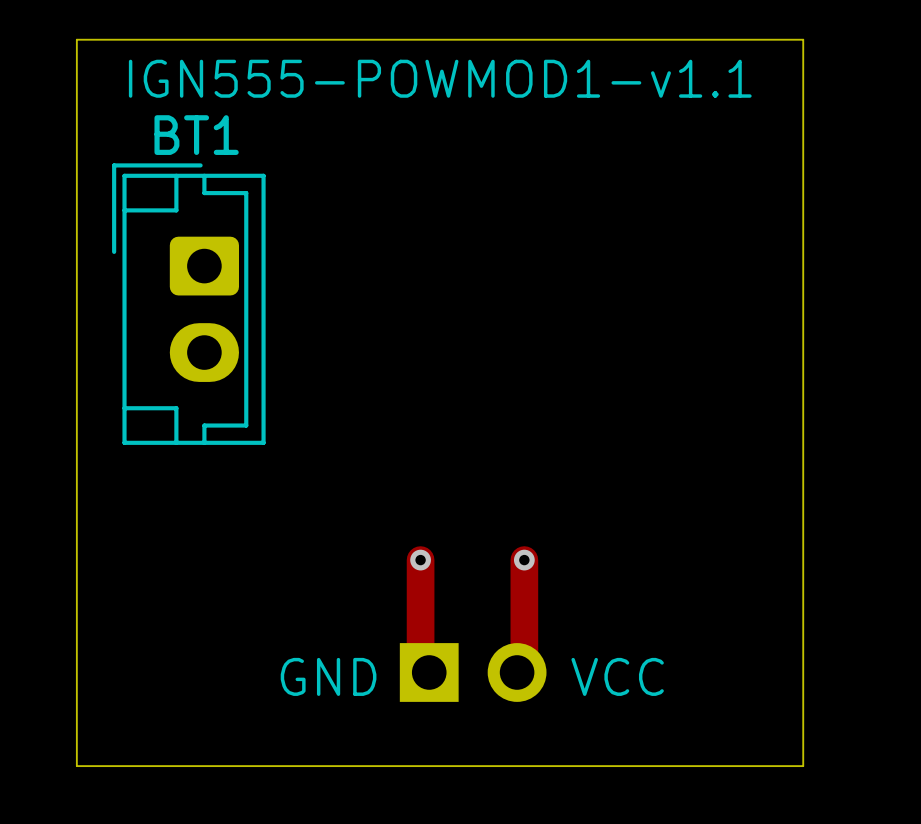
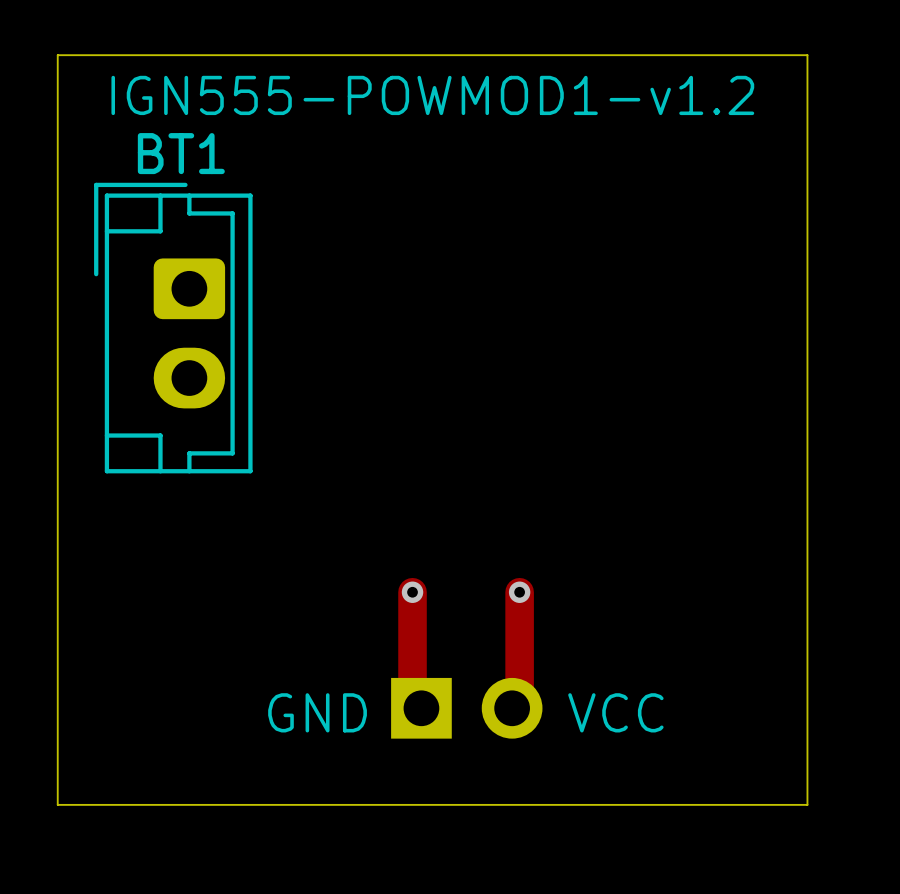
text: IGN555-POWMOD1-v1.1 (440, 78) -> IGN555-POWMOD1-v1.2 (432, 95)

